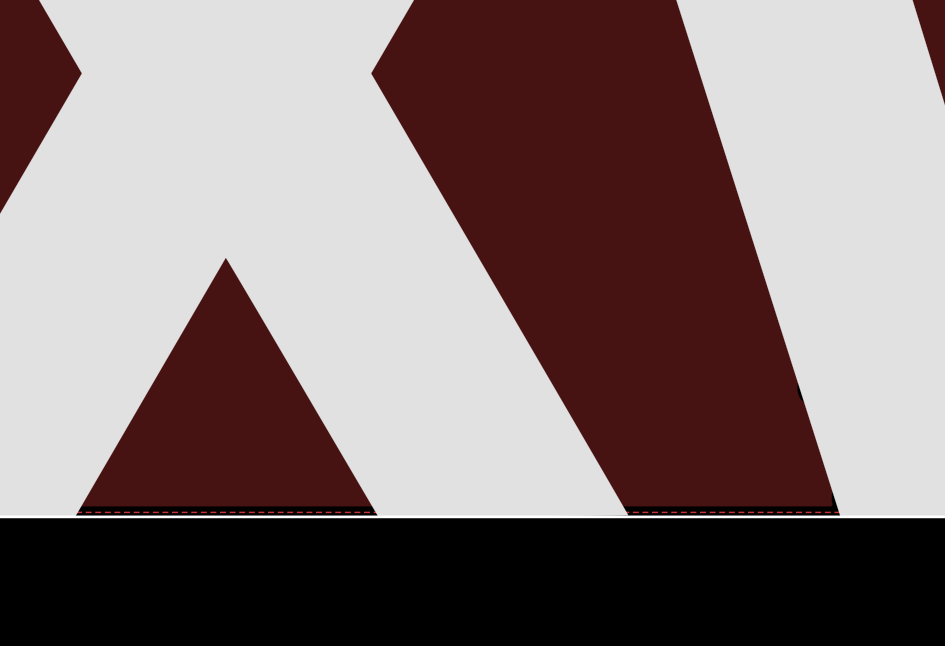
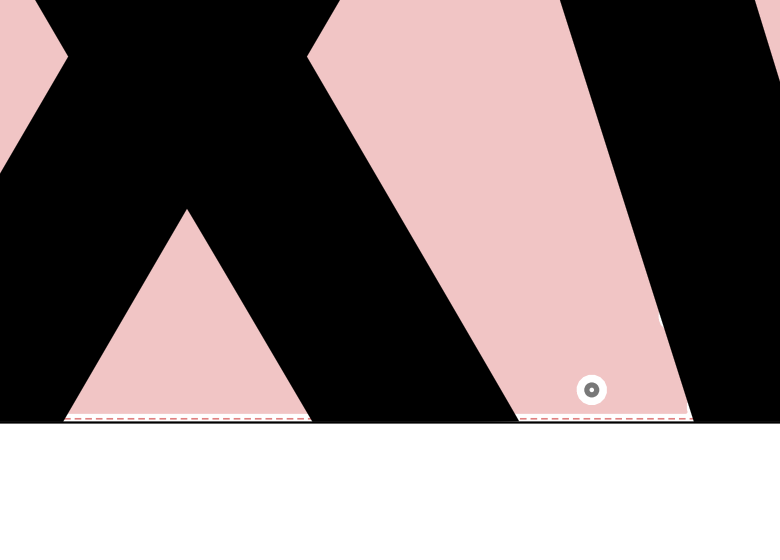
via: none -> (591, 389)

